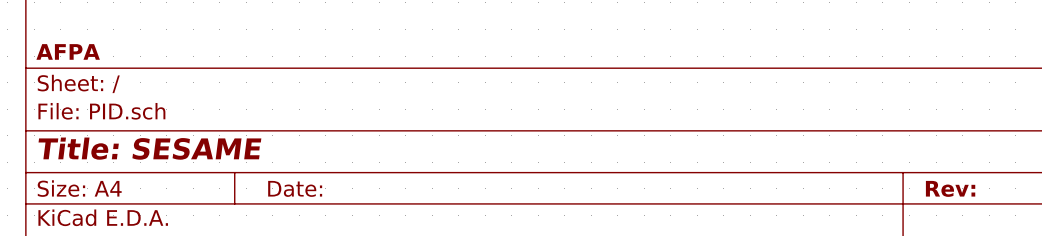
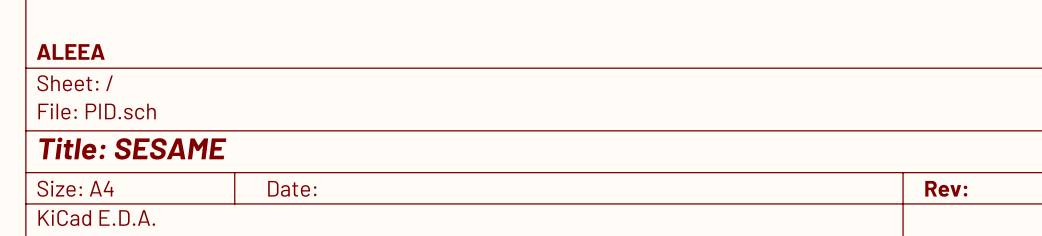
title block: AFPA (68, 51) -> ALEEA (70, 51)

